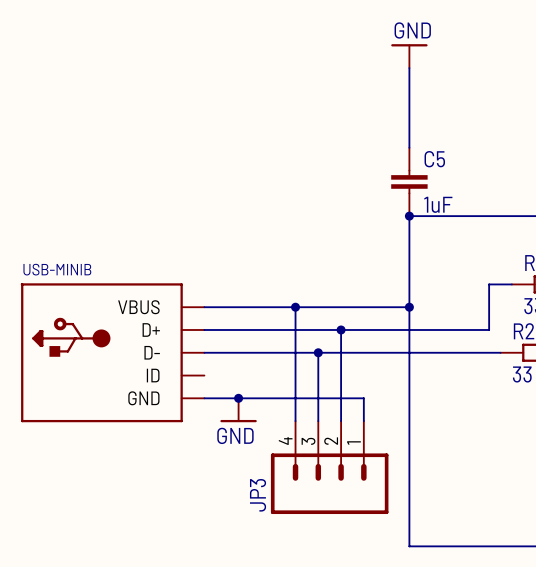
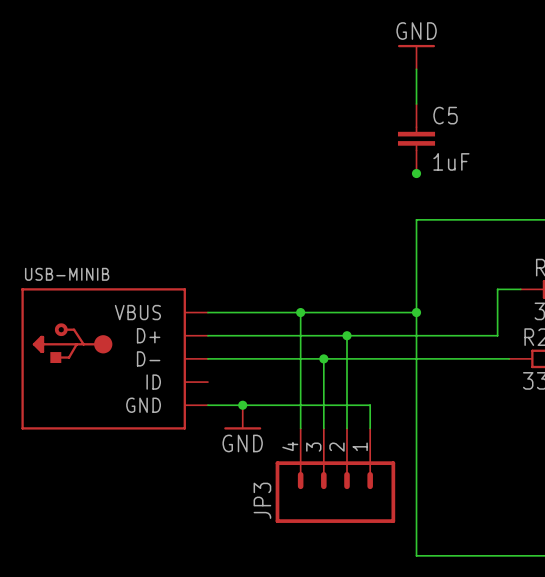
C5 position: (409, 181) -> (416, 138)
junction position: (409, 216) -> (416, 173)

